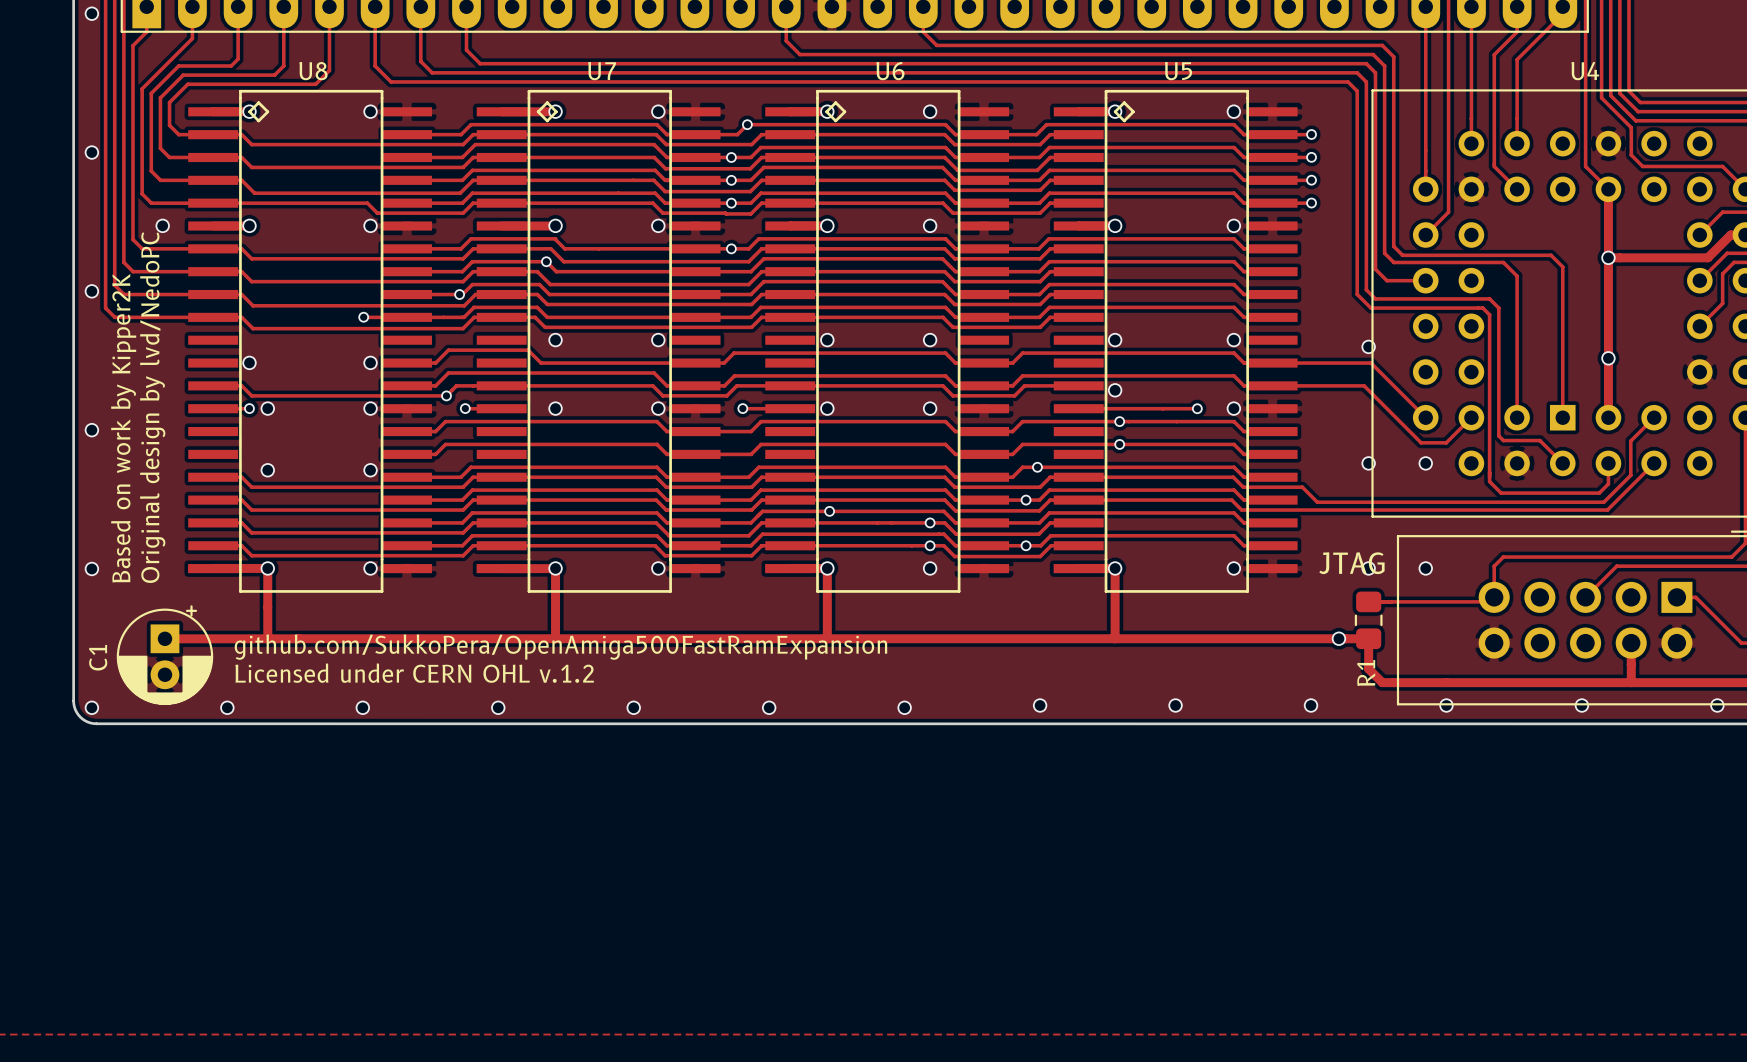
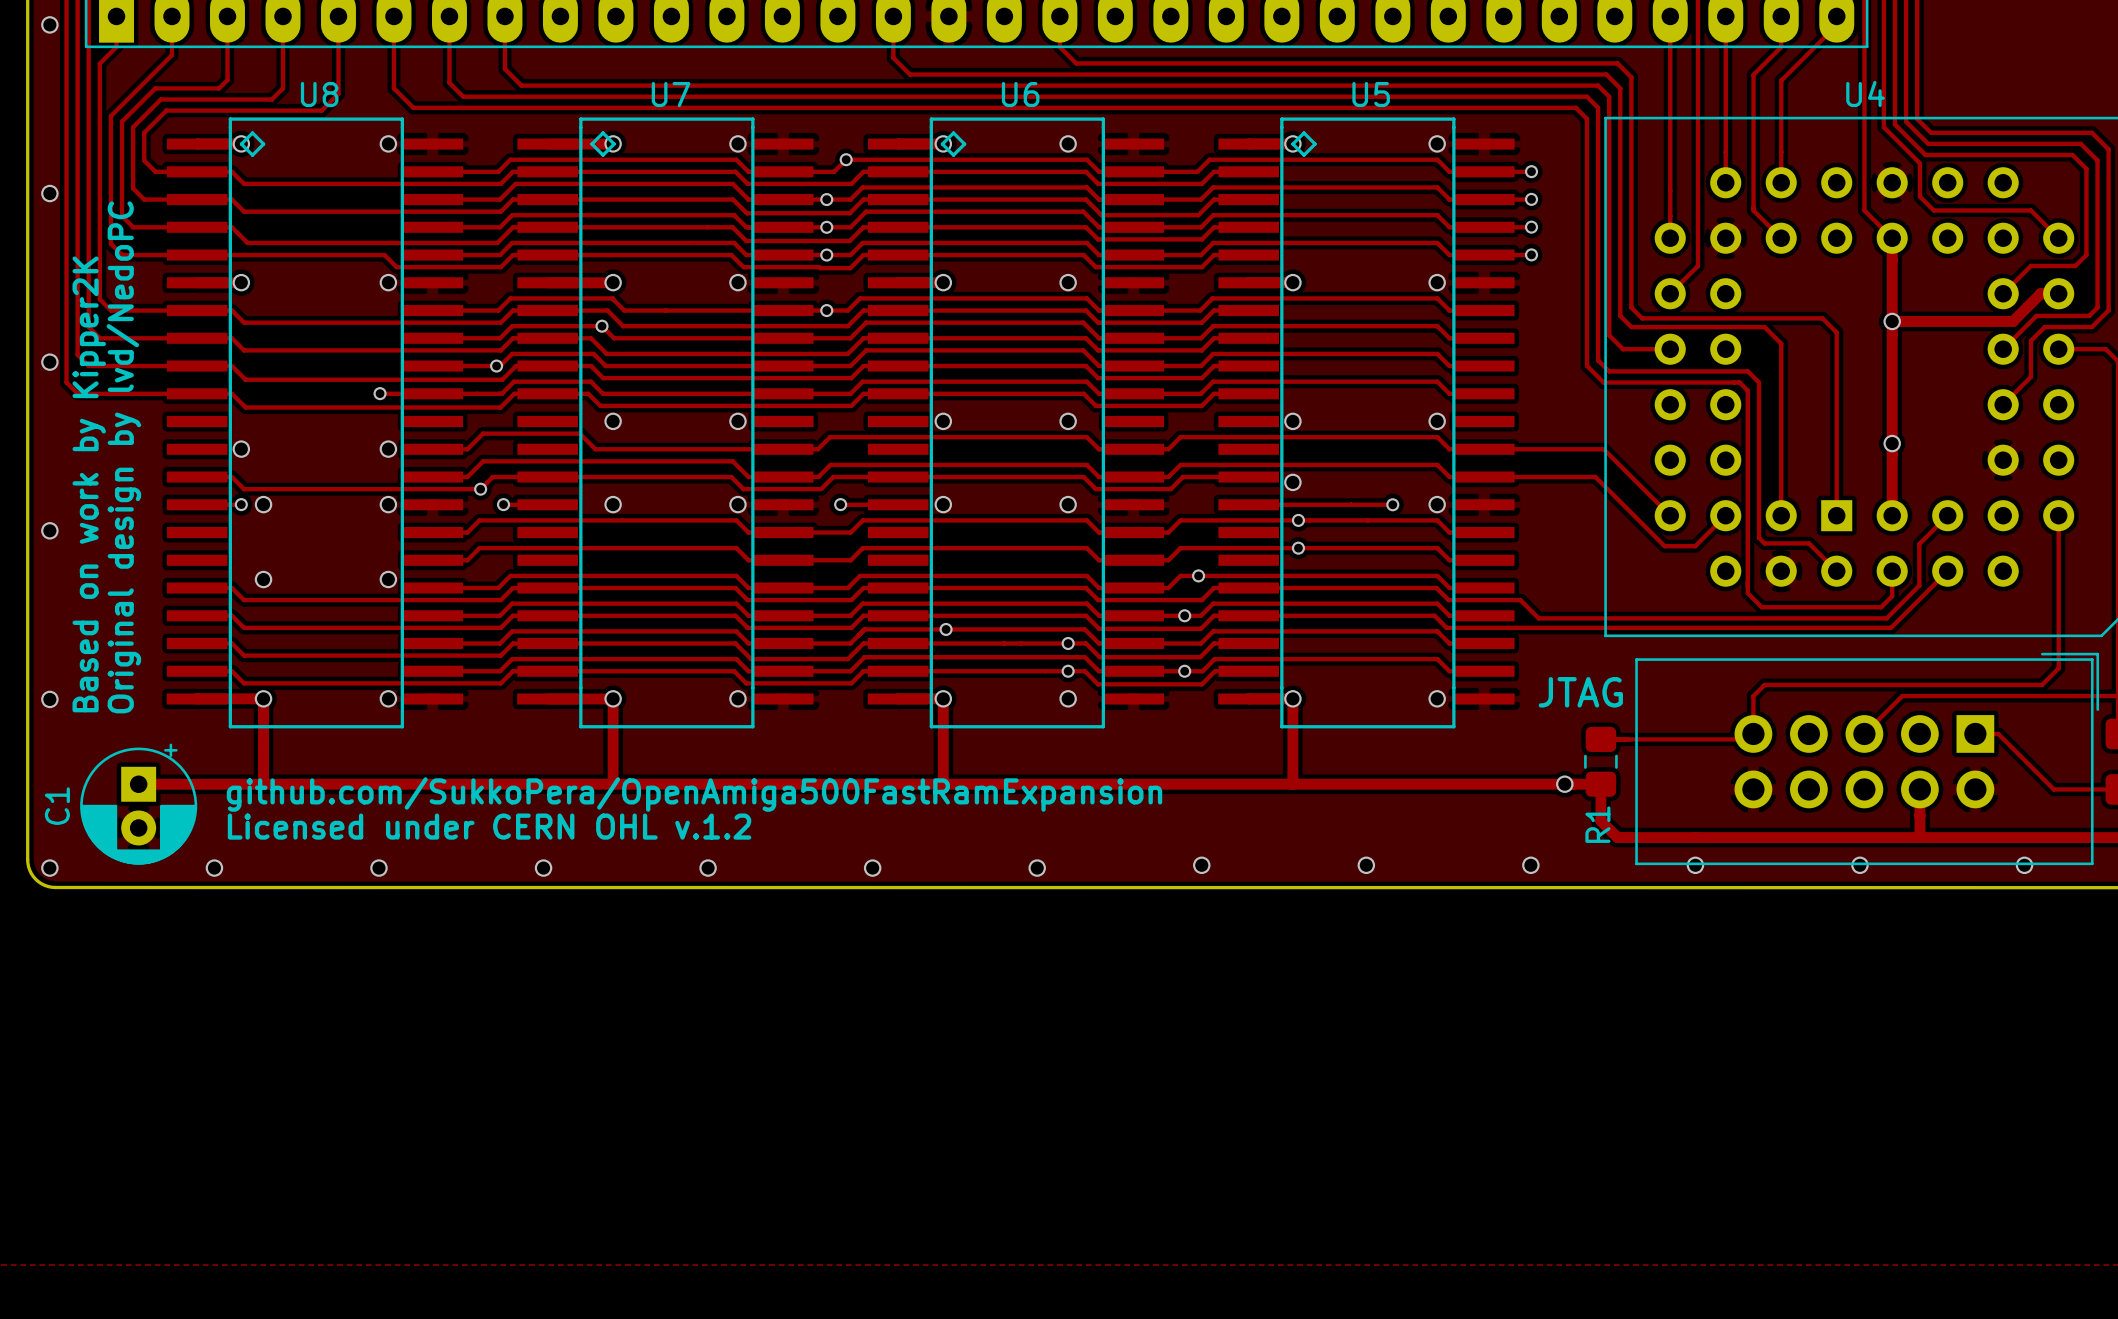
via: (162, 225) -> none
via: (1368, 346) -> none
via: (1368, 463) -> none
via: (1425, 463) -> none
via: (1368, 568) -> none
via: (1425, 568) -> none

